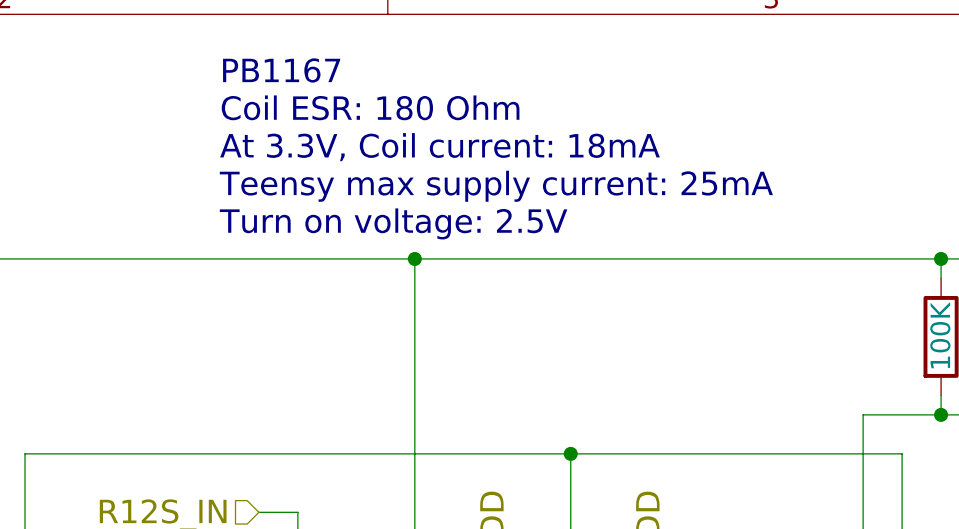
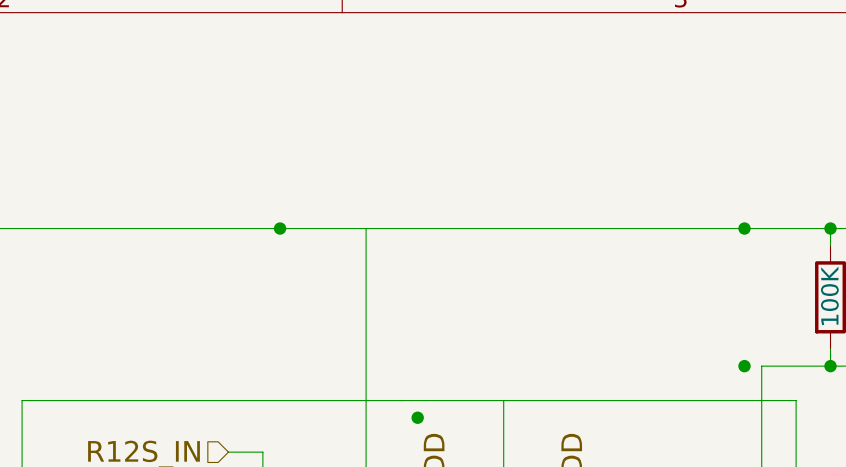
text: PB1167 (281, 70) -> none
text: Coil ESR: 180 Ohm (370, 107) -> none
text: At 3.3V, Coil current: 18mA (439, 147) -> none
text: Teensy max supply current: 25mA (496, 186) -> none
text: Turn on voltage: 2.5V (393, 223) -> none
junction: none -> (280, 228)
junction: (414, 258) -> none
junction: none -> (744, 228)
junction: none -> (744, 366)
junction: (570, 453) -> none
junction: none -> (417, 417)

